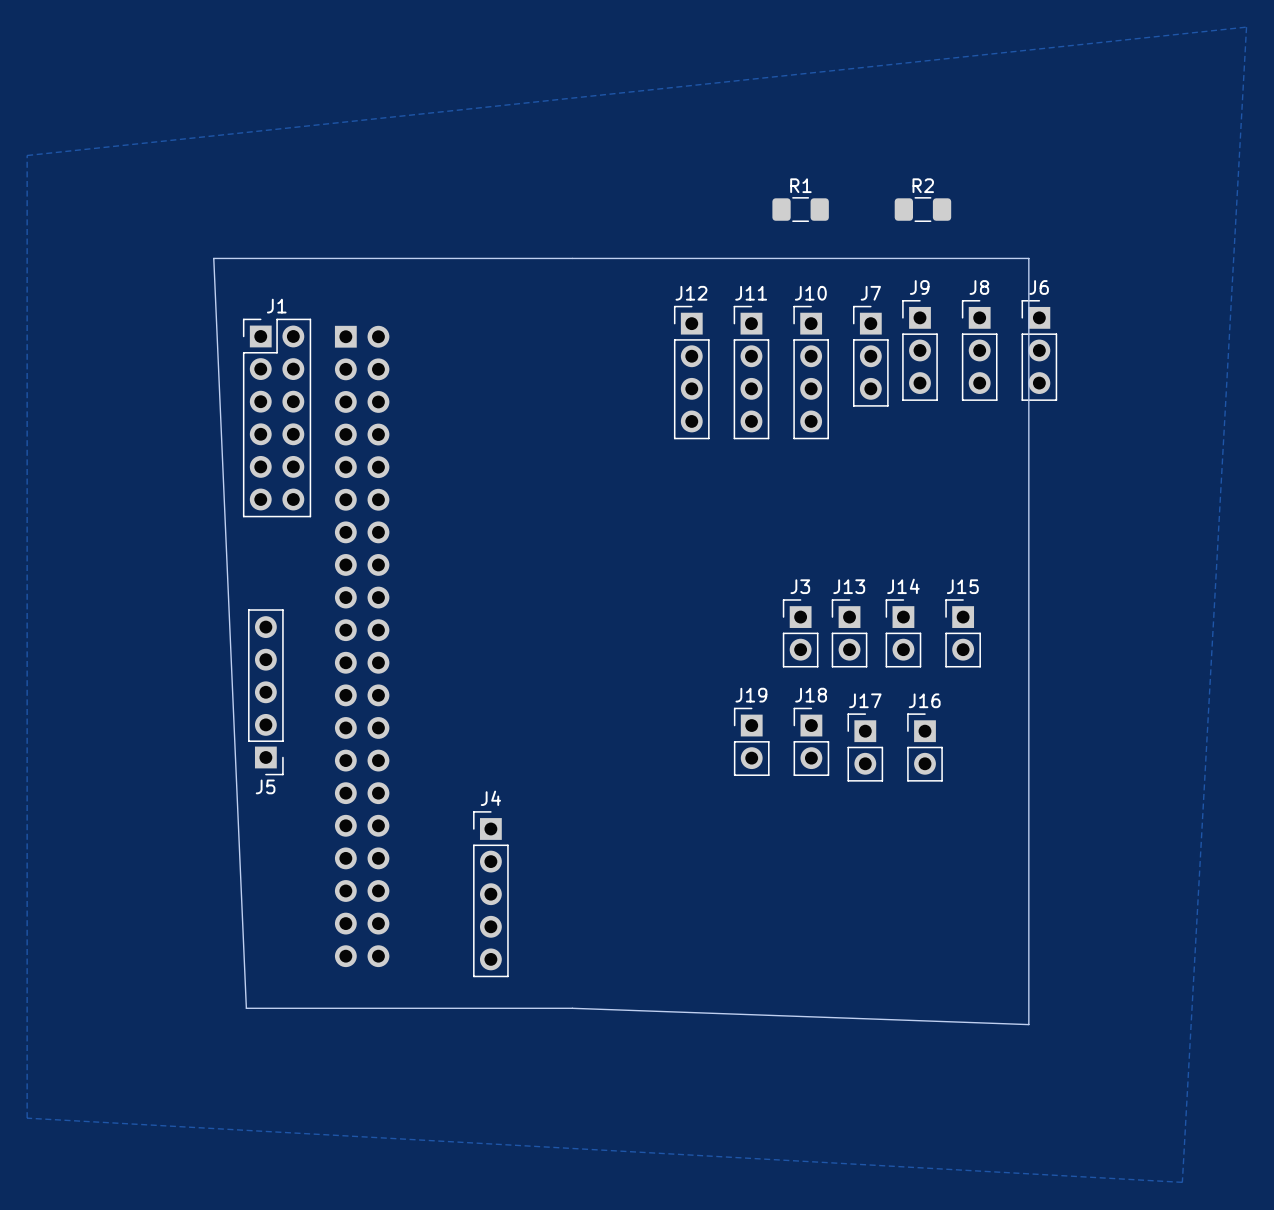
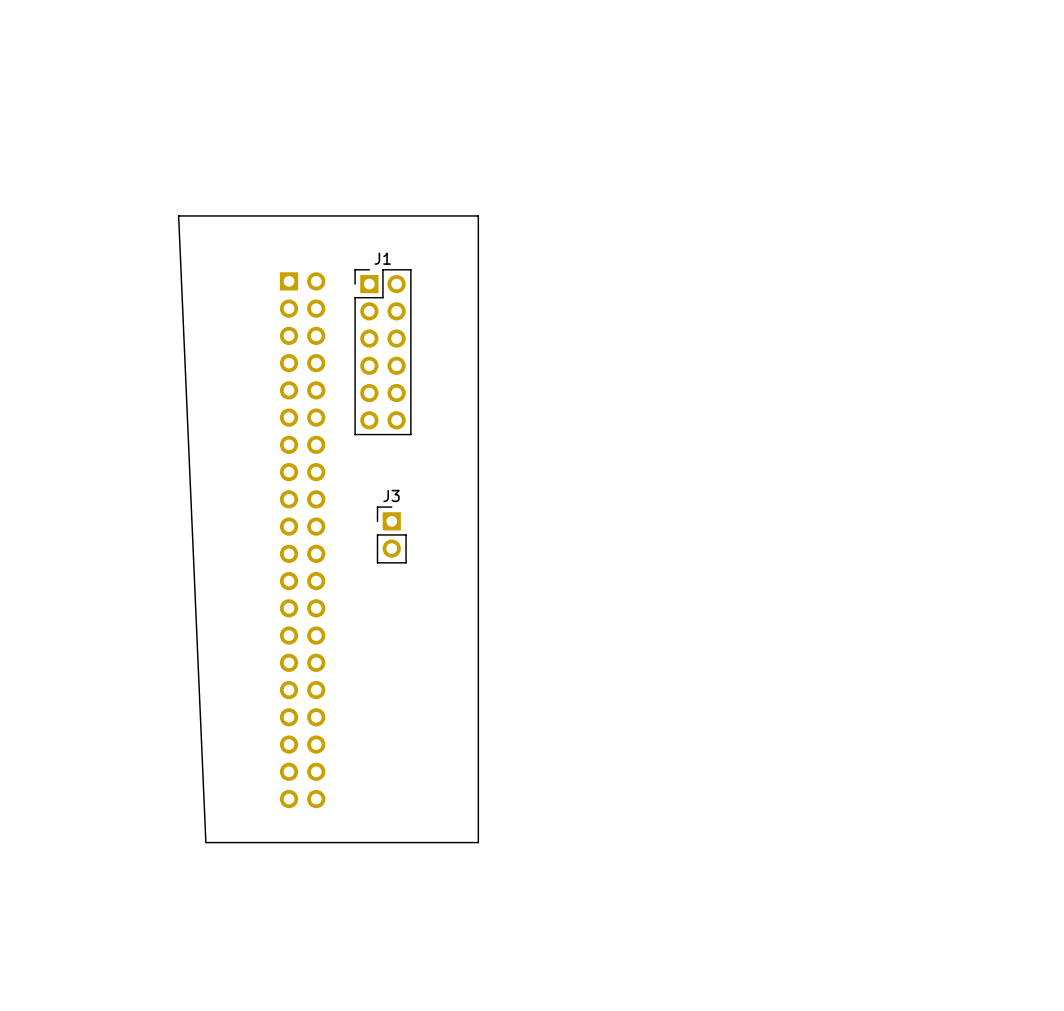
zone outline: (1246, 27) (27, 155) (27, 1118) (1182, 1182) (1246, 27) -> none
R1: (800, 209) -> none
R2: (922, 209) -> none
board edge: (572, 258) (1028, 258) (1028, 1024) (572, 1008) -> (478, 215) (478, 842)
J9: (919, 350) -> none
J8: (979, 350) -> none
J6: (1039, 350) -> none
J7: (870, 356) -> none
J12: (691, 372) -> none
J11: (751, 372) -> none
J10: (811, 372) -> none
J1 position: (277, 417) -> (382, 352)
J3 position: (800, 633) -> (391, 534)
J13: (849, 633) -> none
J14: (903, 633) -> none
J15: (963, 633) -> none
J5: (265, 692) -> none
J19: (751, 741) -> none
J18: (811, 741) -> none
J17: (865, 747) -> none
J16: (925, 747) -> none
J4: (490, 894) -> none

